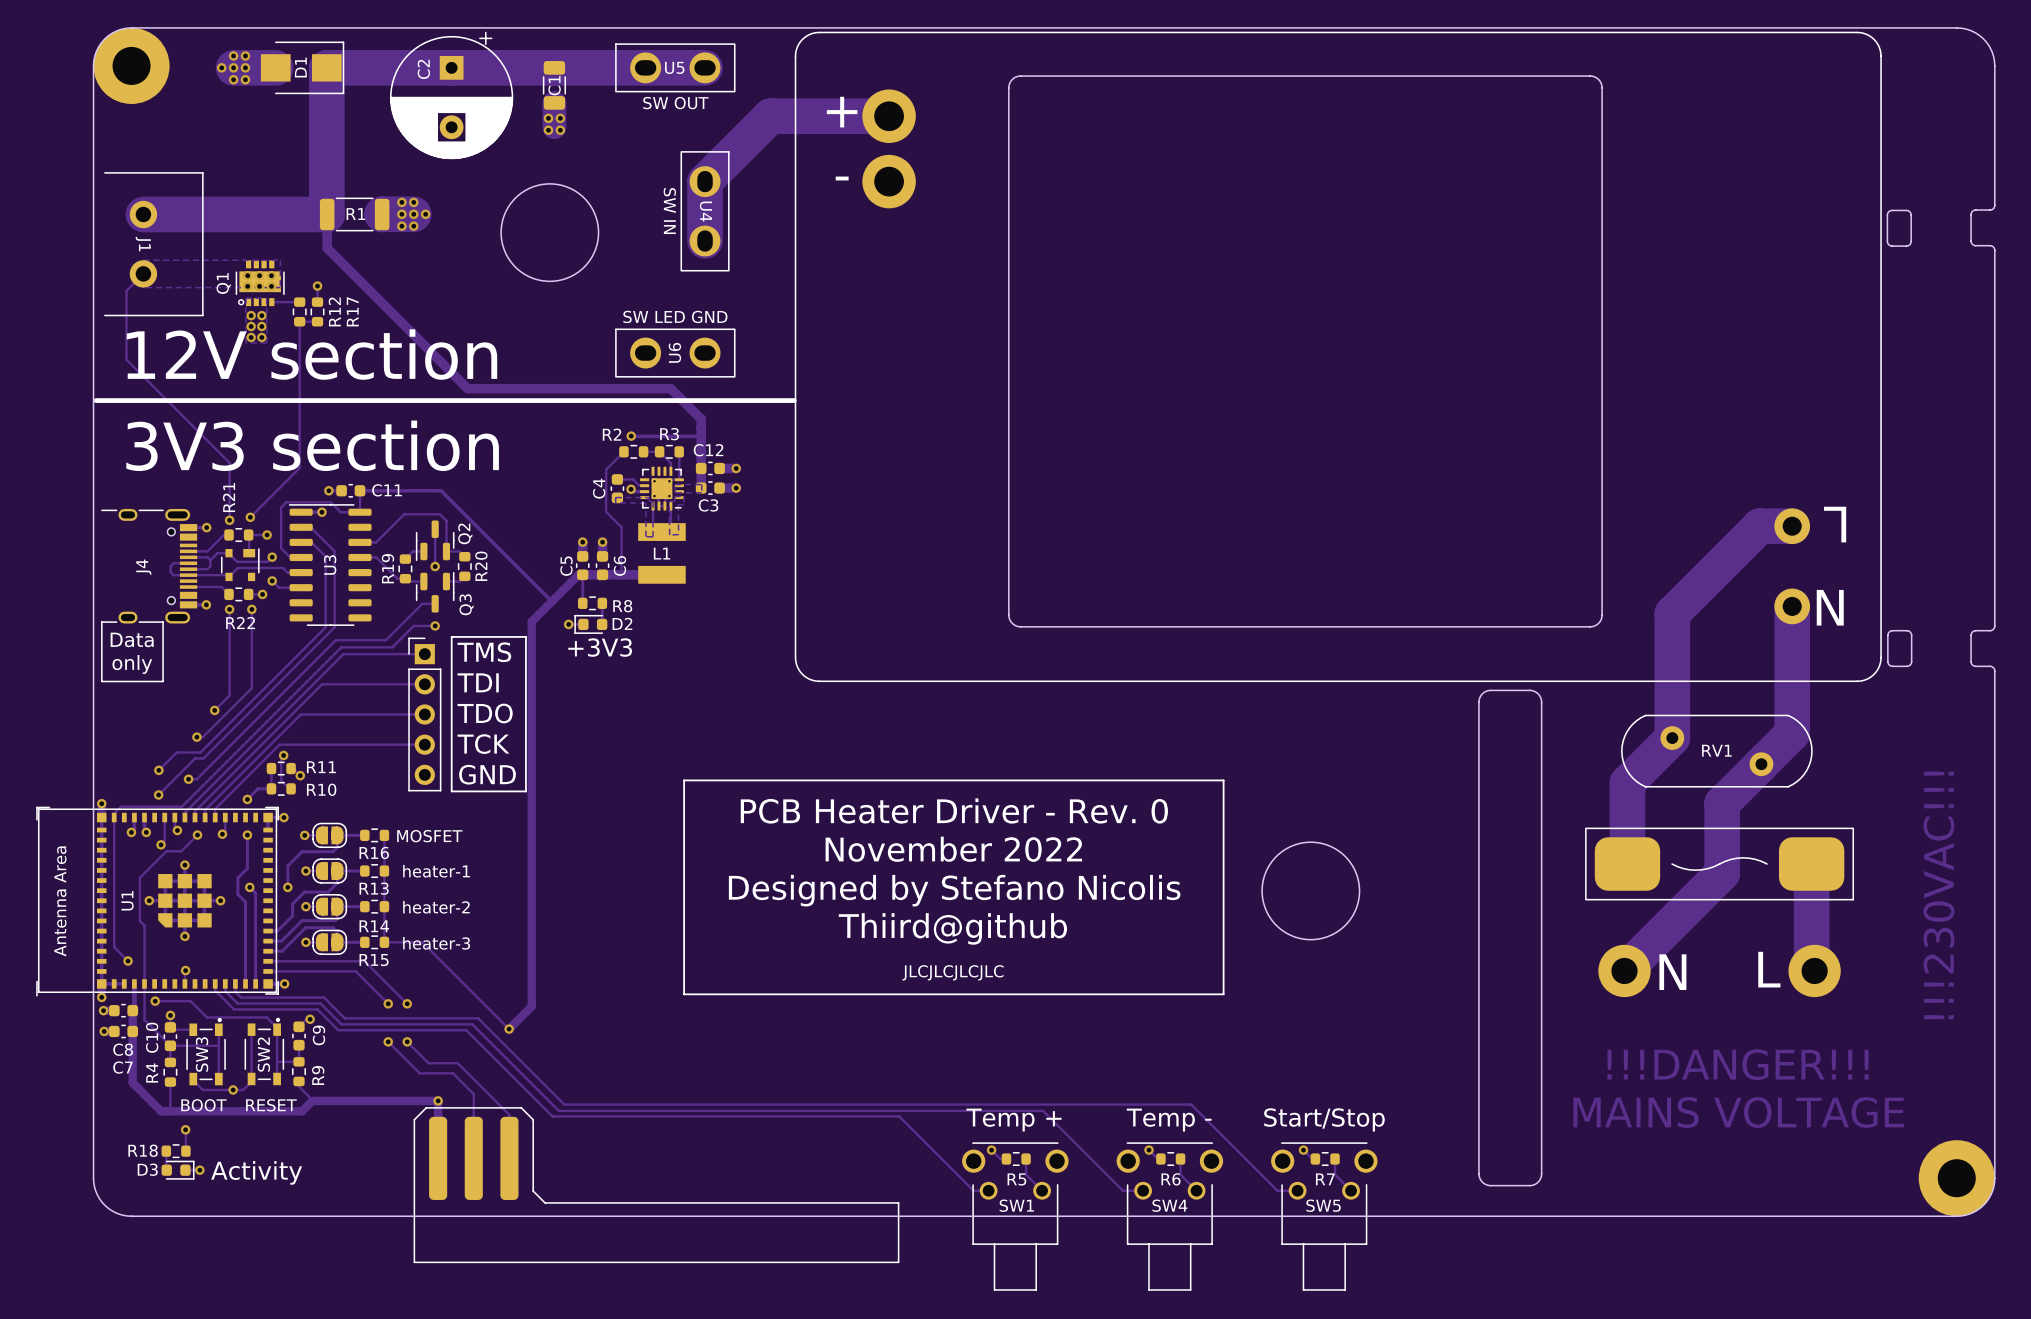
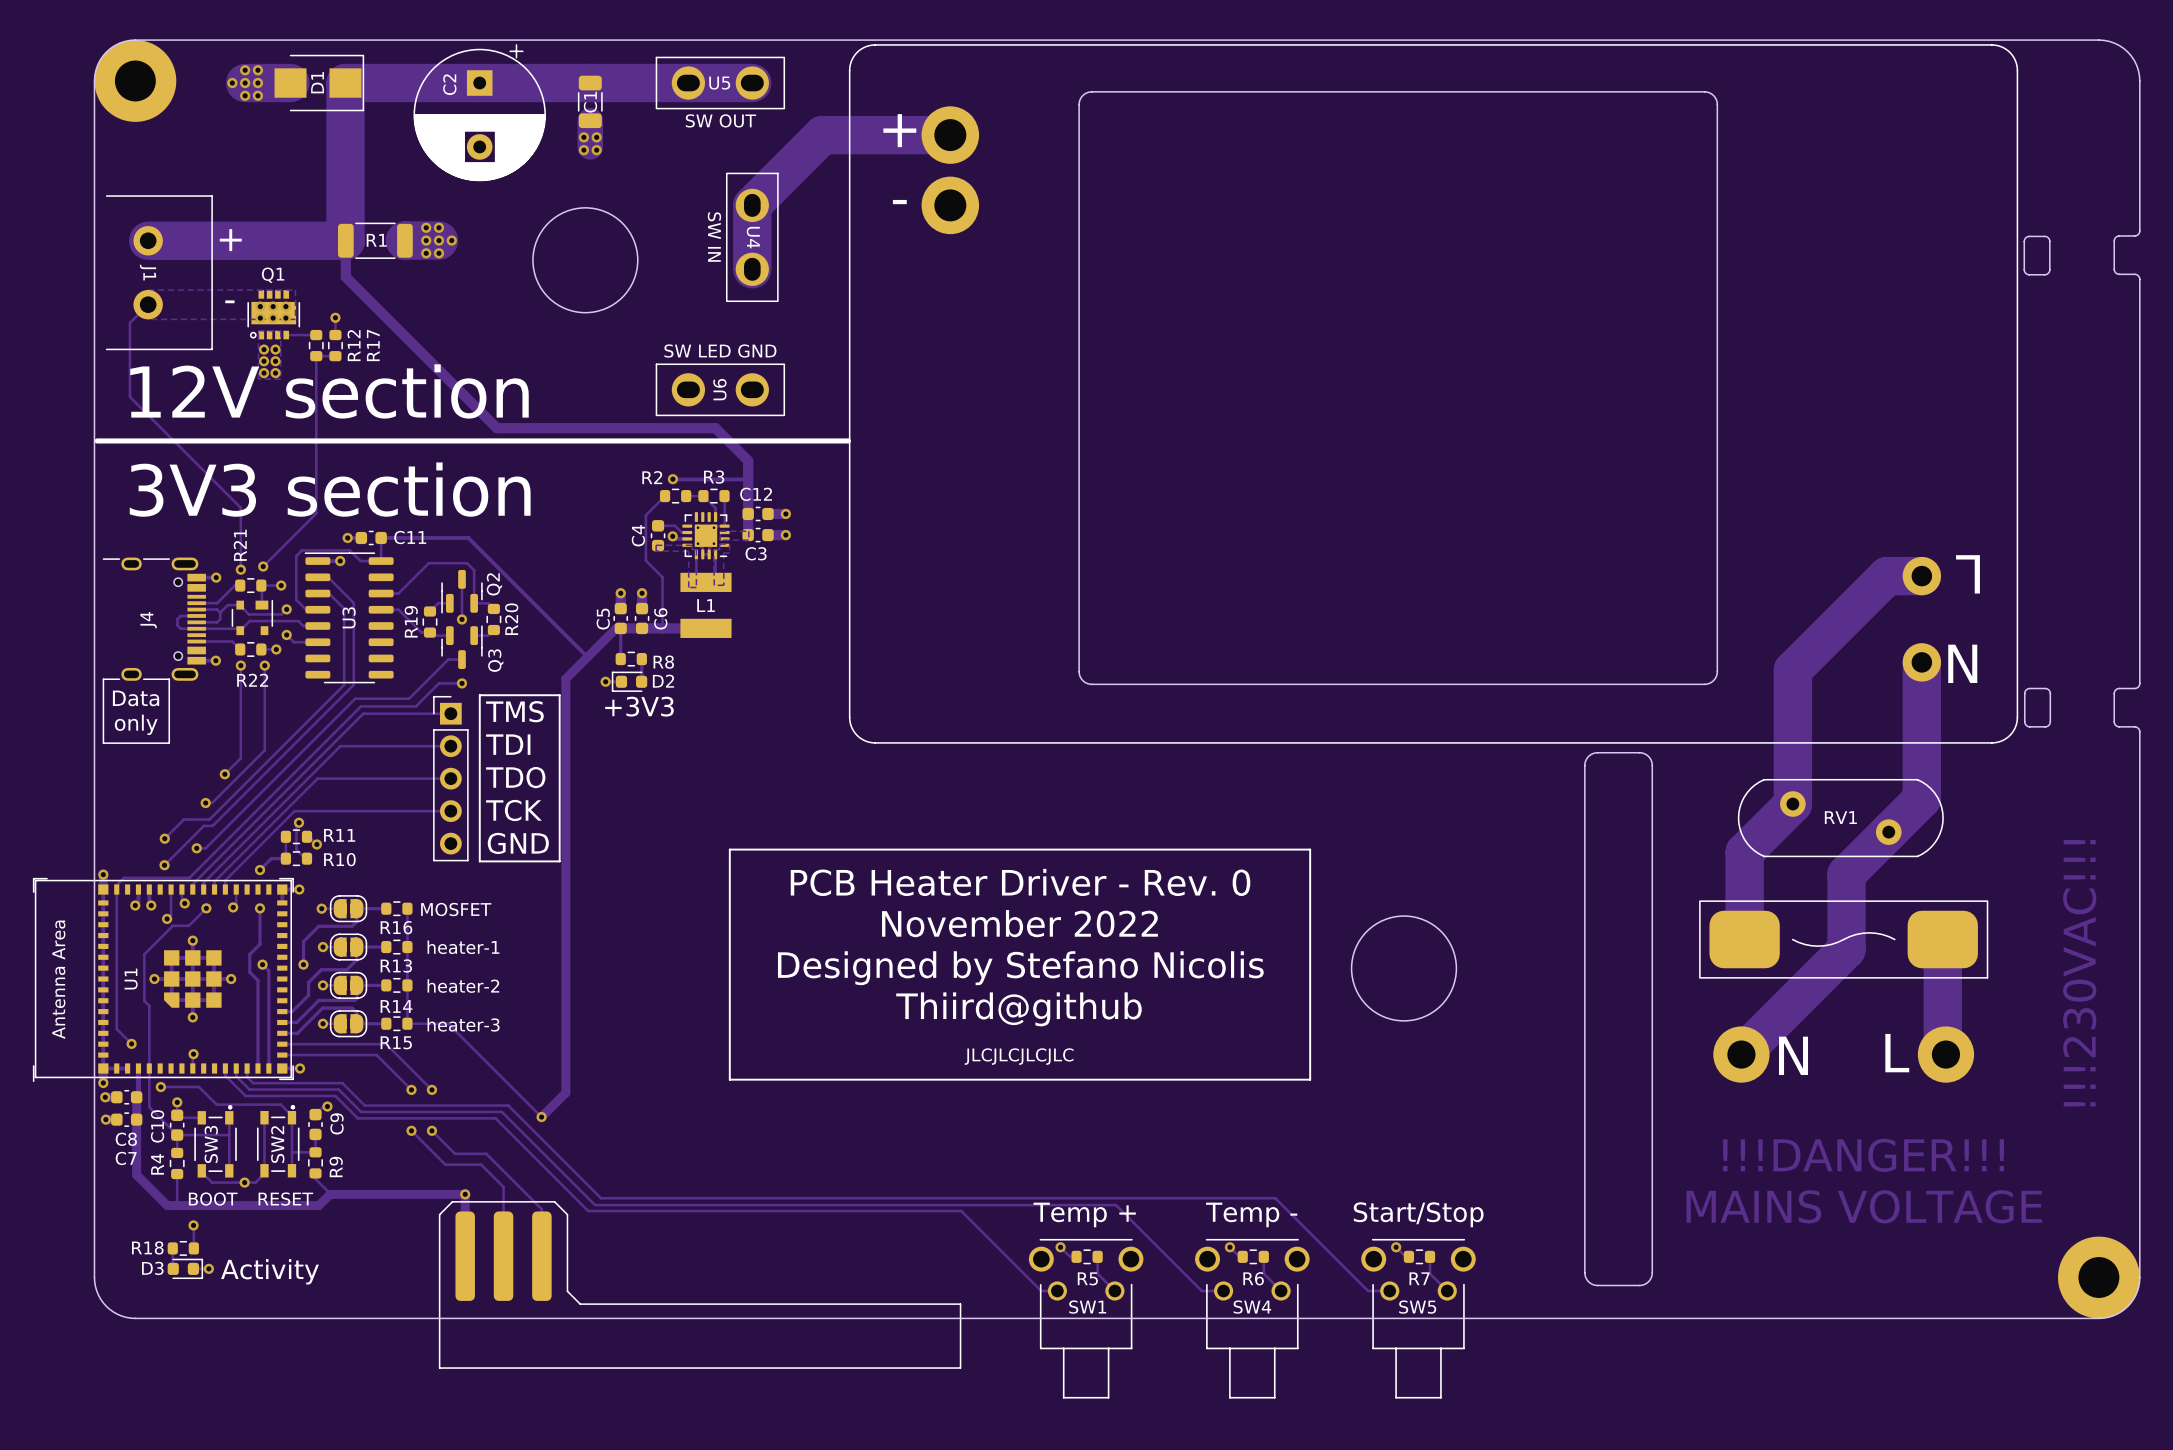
text: none -> + (230, 240)
text: none -> - (229, 301)
Q1 name rotation: 0° (223, 283) -> 90° clockwise (273, 275)
Q1 name position: Q1 (223, 283) -> Q1 (273, 275)

